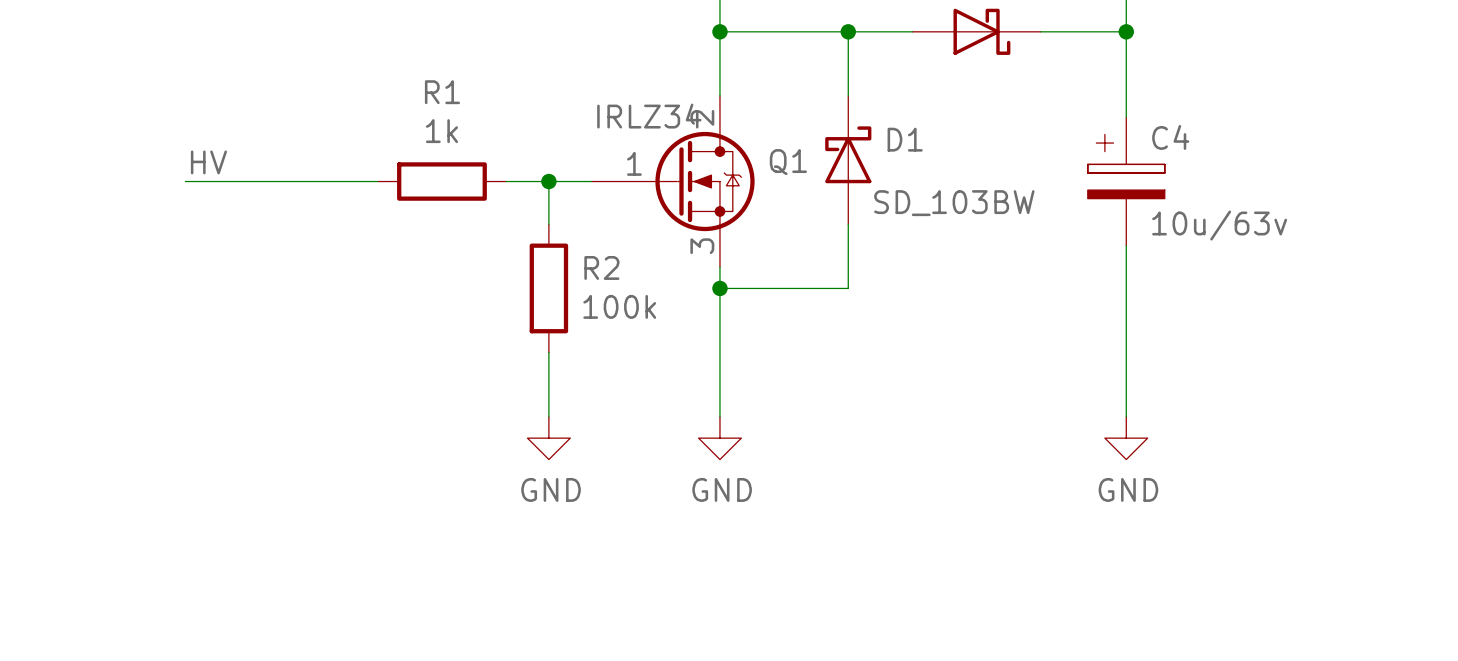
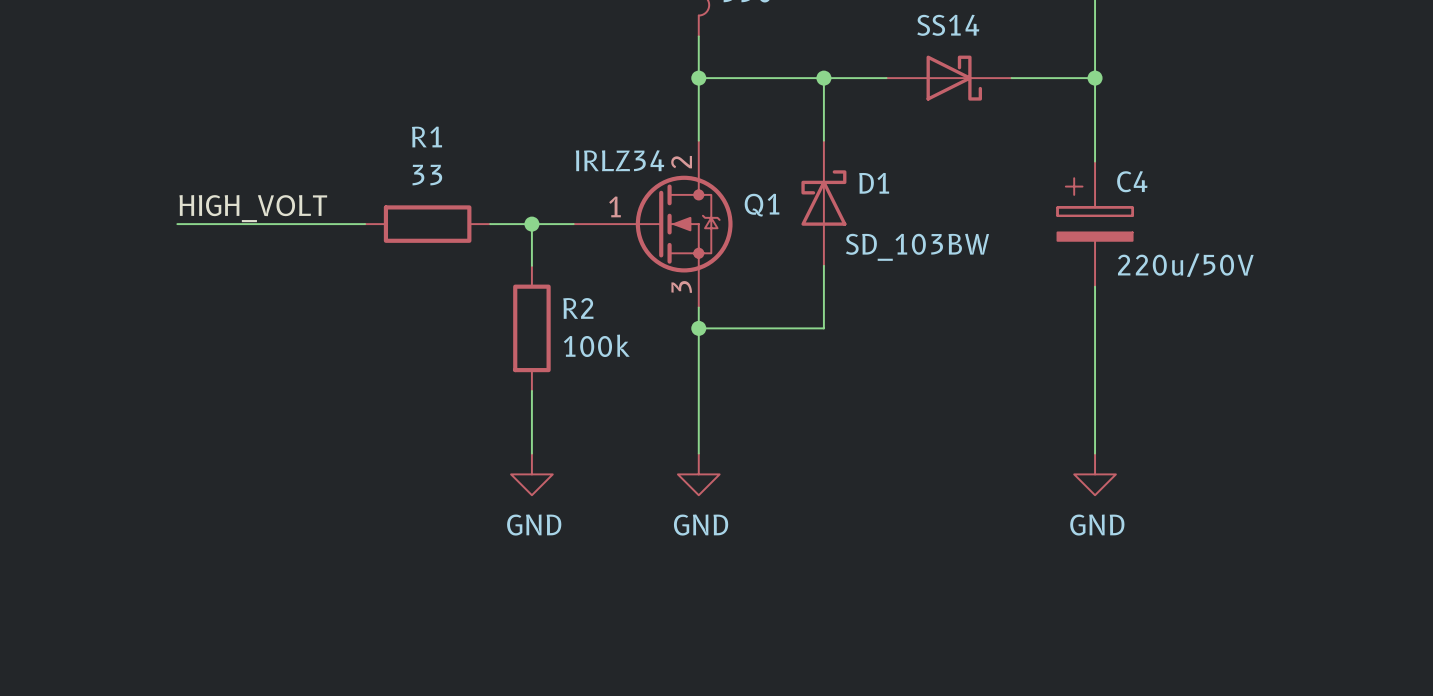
R1 value: 1k (441, 131) -> 33 (427, 175)
label: HV (208, 162) -> HIGH_VOLT (253, 208)
C4 value: 10u/63v (1219, 225) -> 220u/50V (1185, 265)

